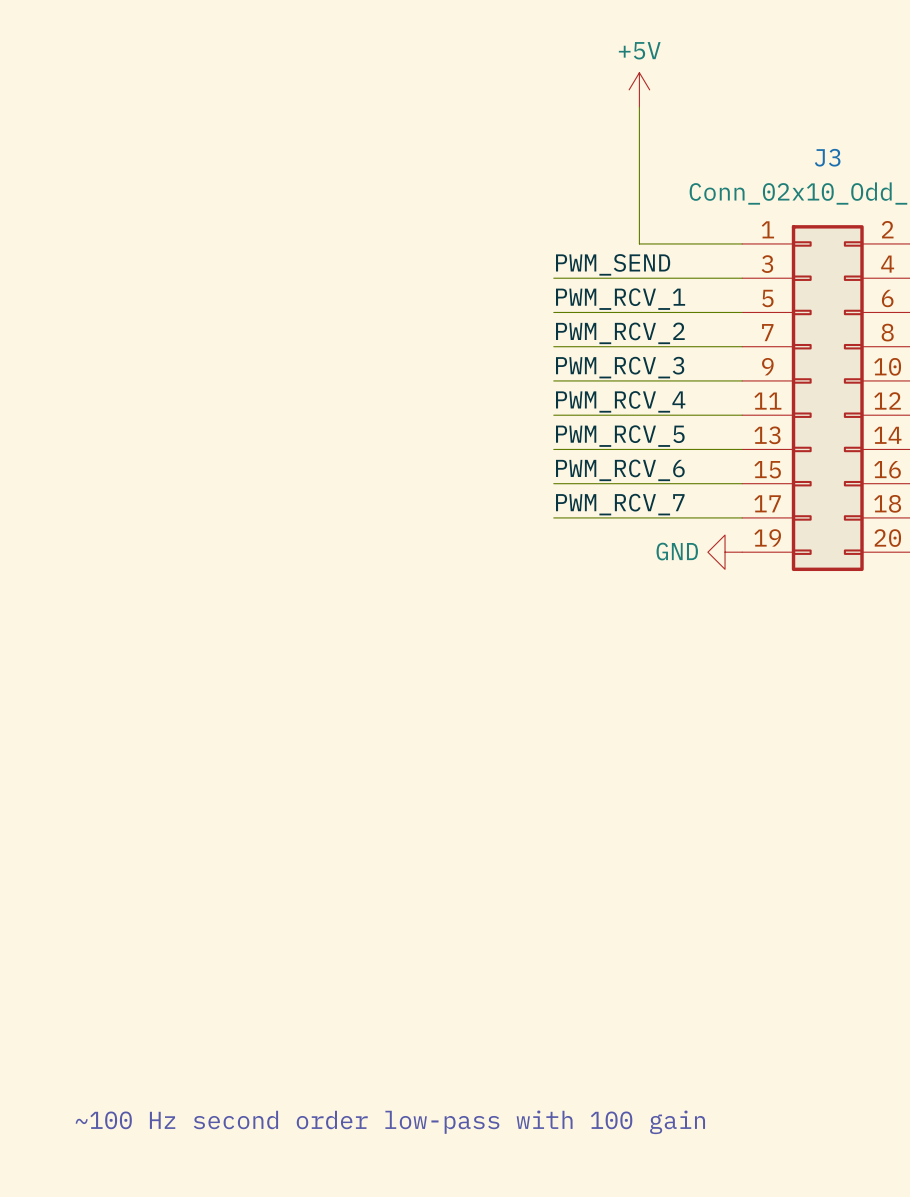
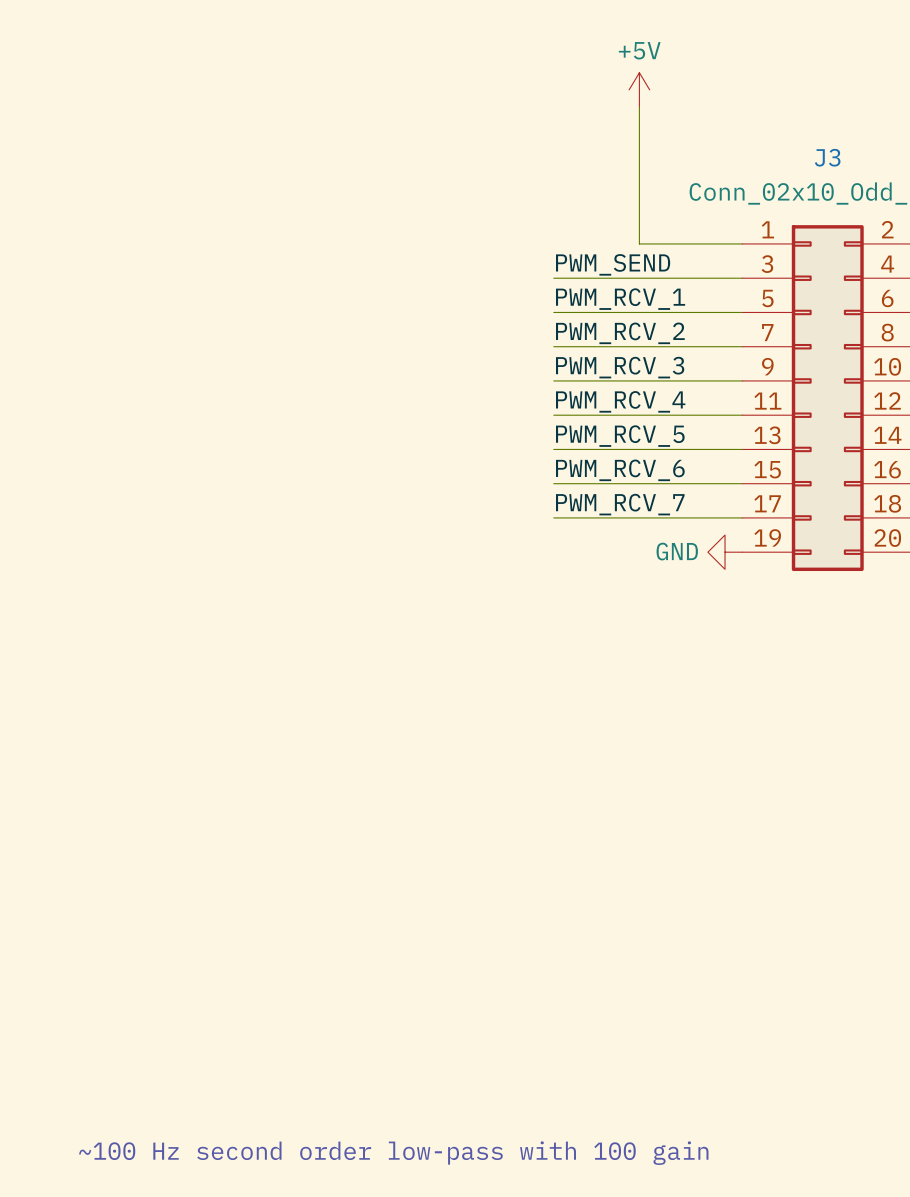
text position: ~100 Hz second order low-pass with 100 gain (390, 1122) -> ~100 Hz second order low-pass with 100 gain (393, 1153)

